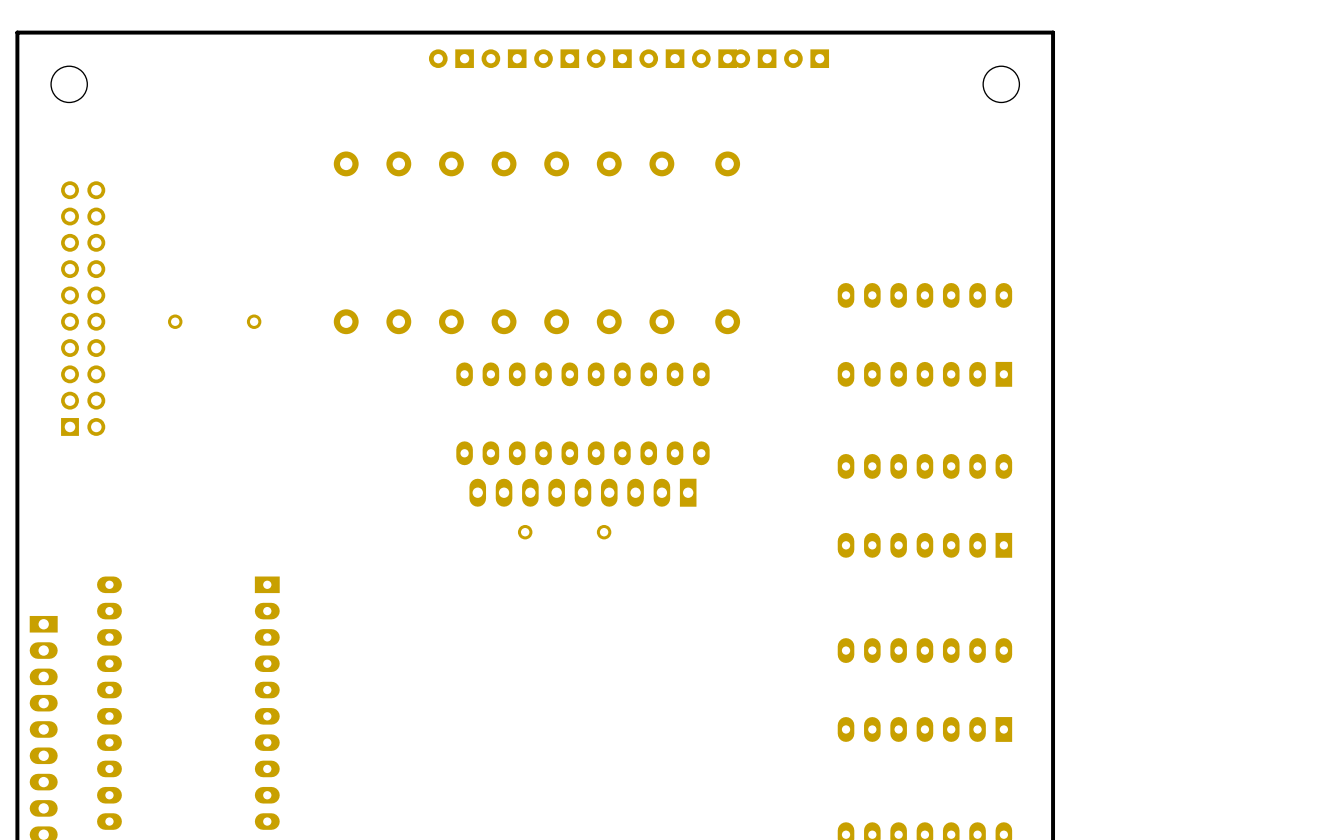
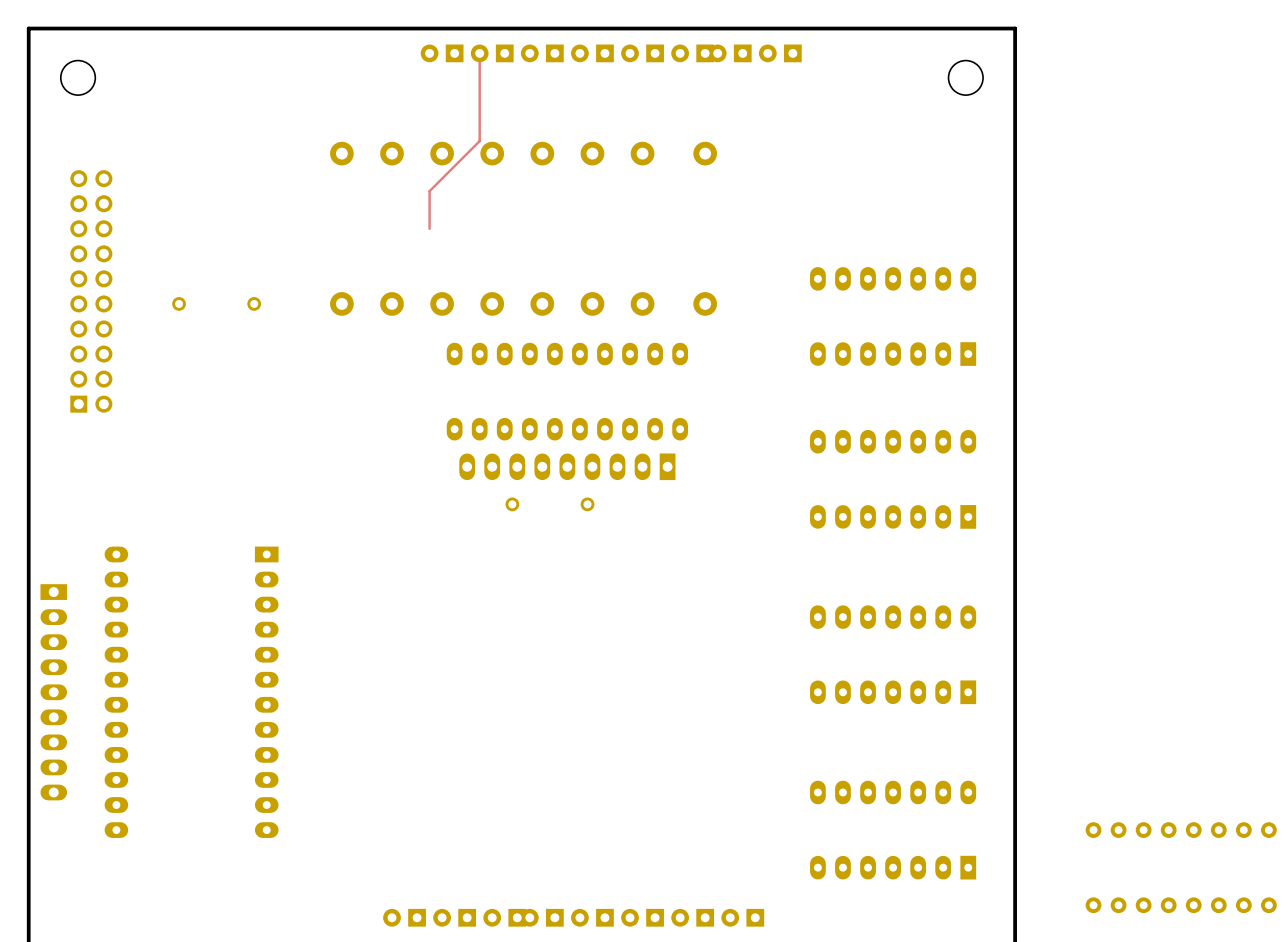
top track: none -> (479, 53) (479, 141) (429, 191) (429, 228)

